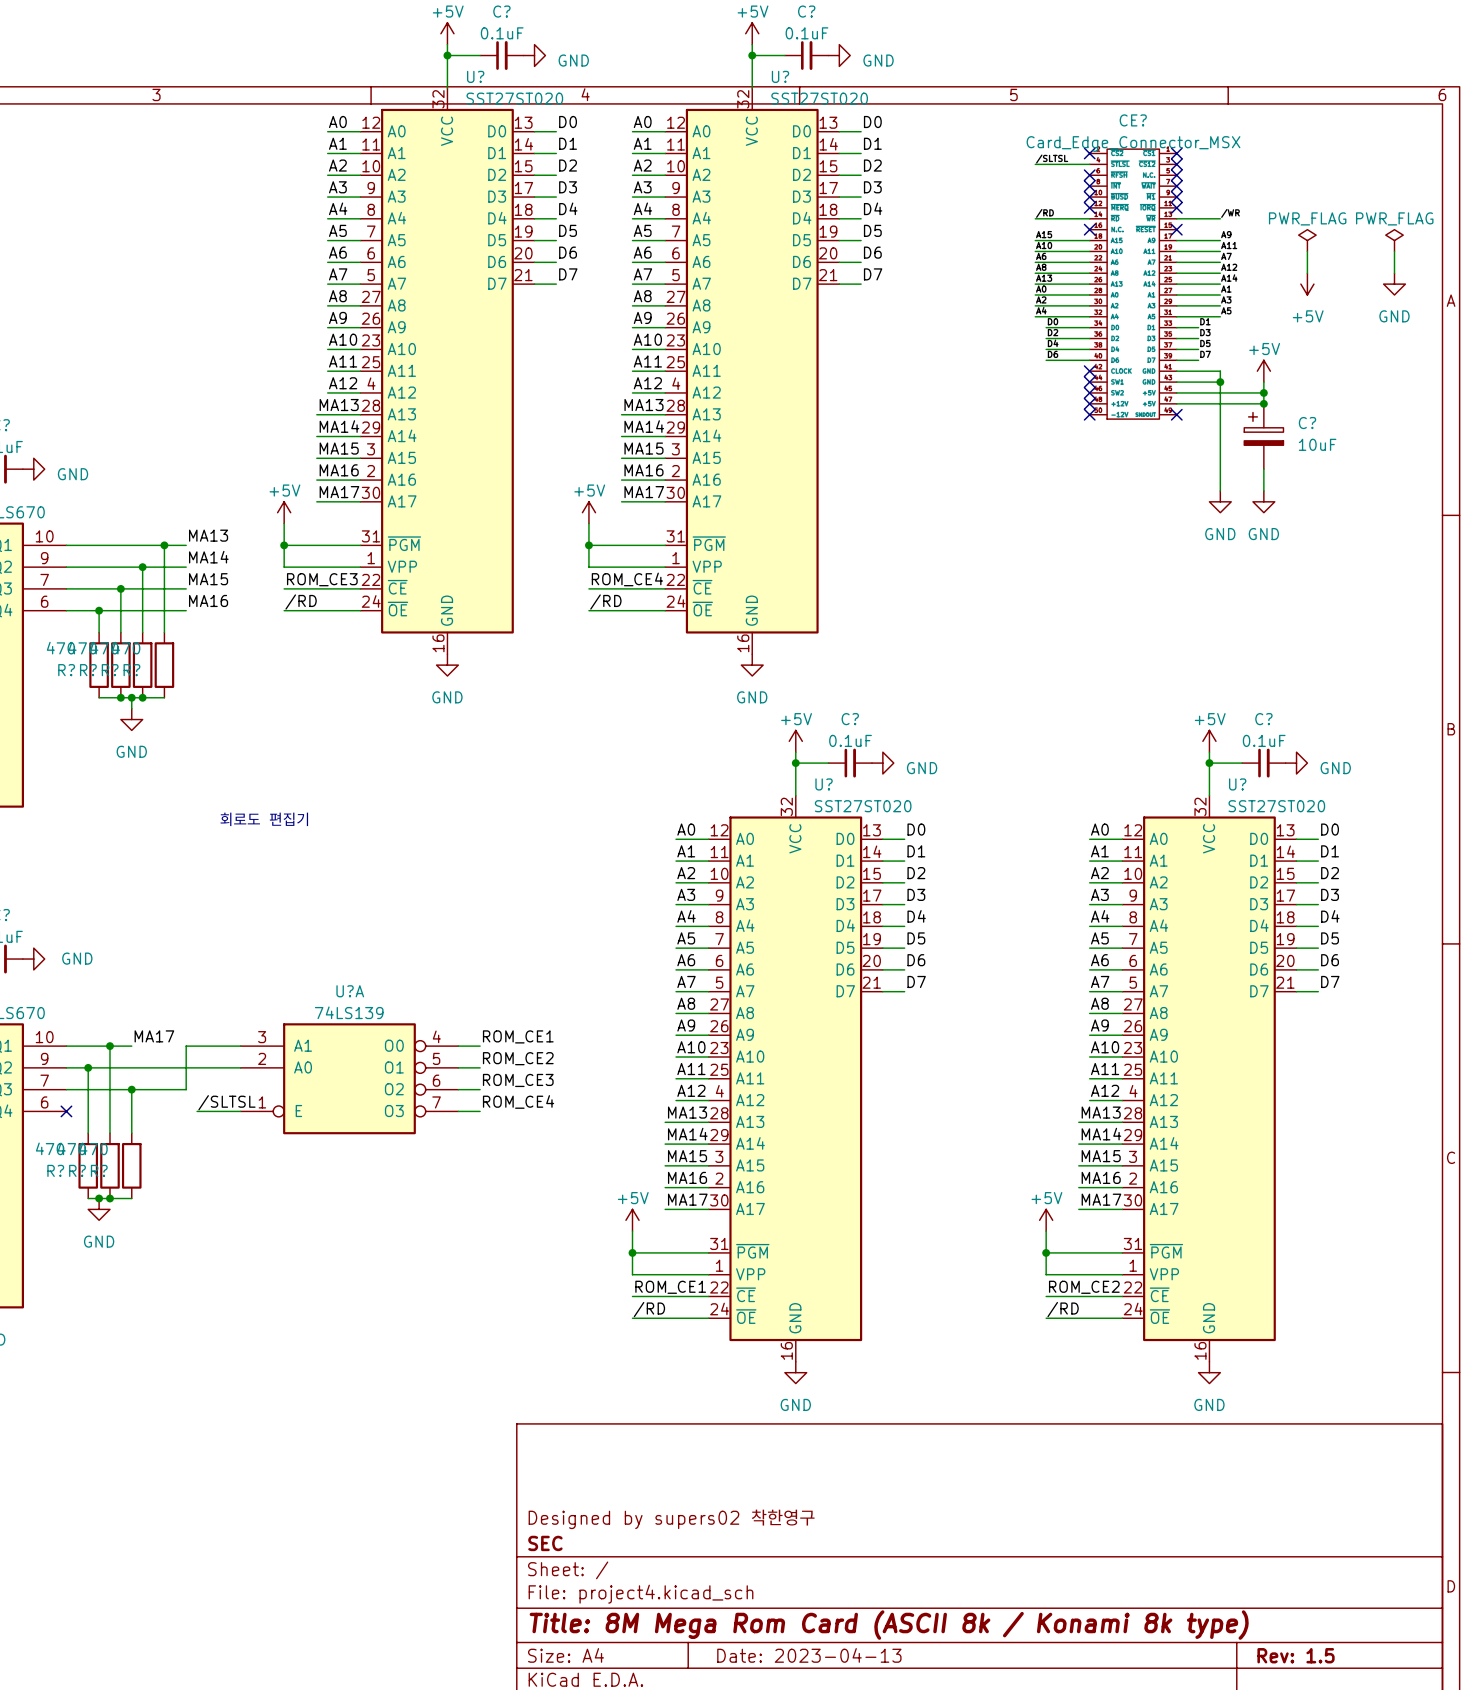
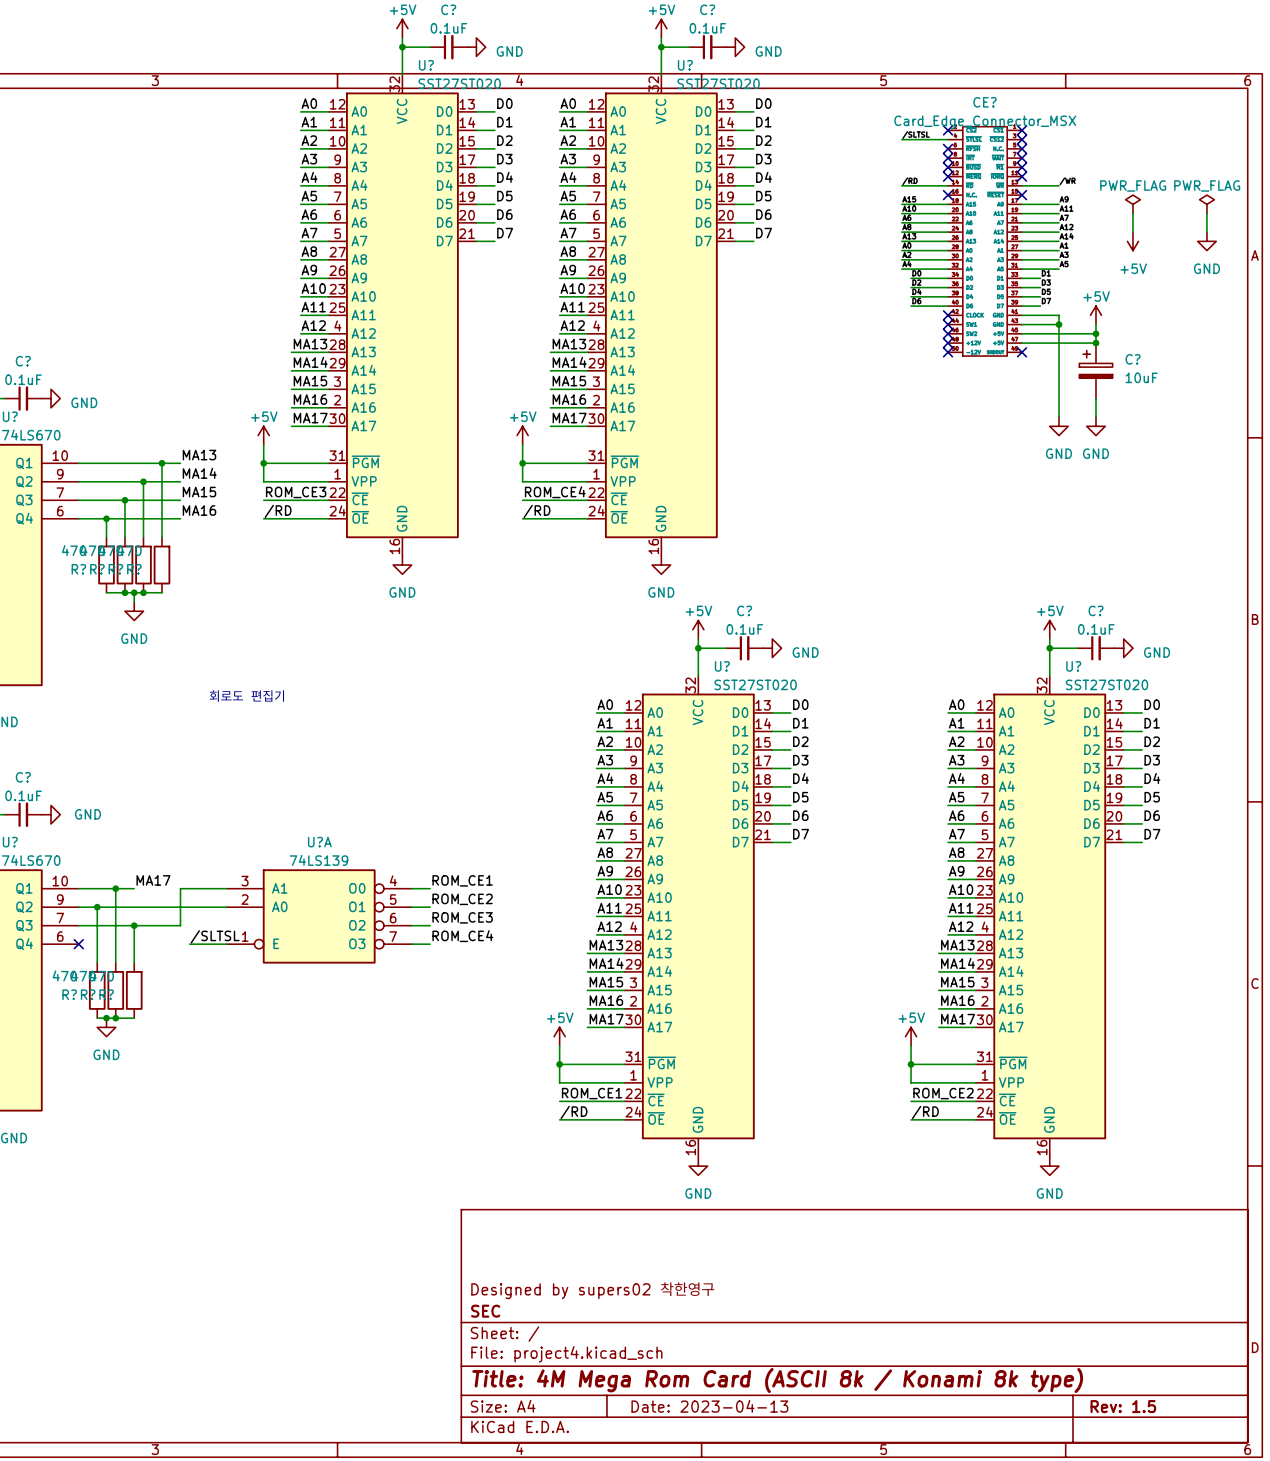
title block: Title: 8M Mega Rom Card (ASCII 8k / Konami 8k type) (889, 1625) -> Title: 4M Mega Rom Card (ASCII 8k / Konami 8k type) (777, 1380)

